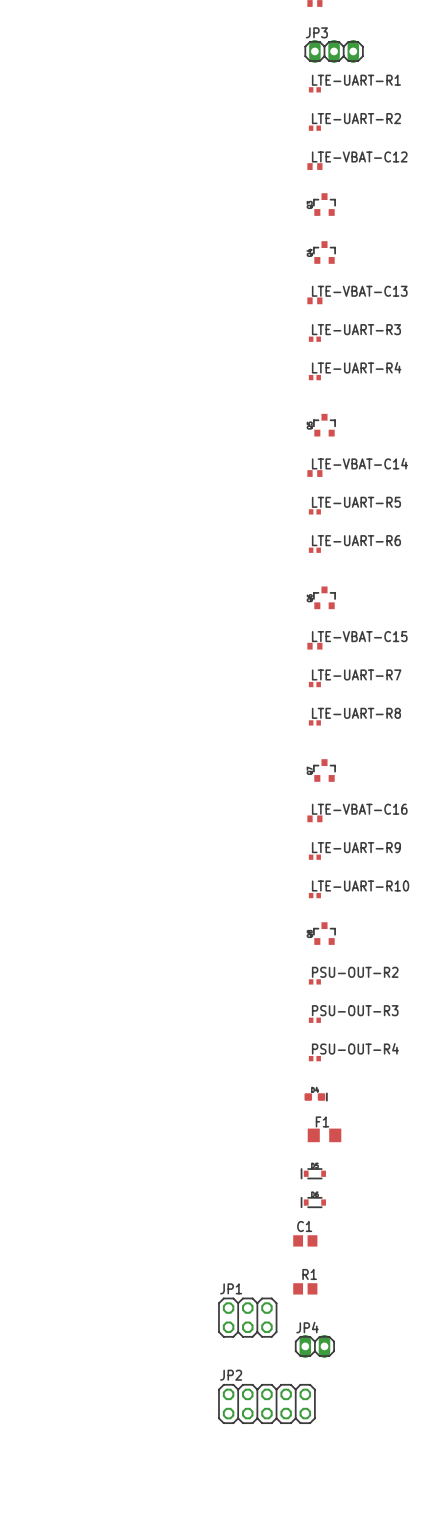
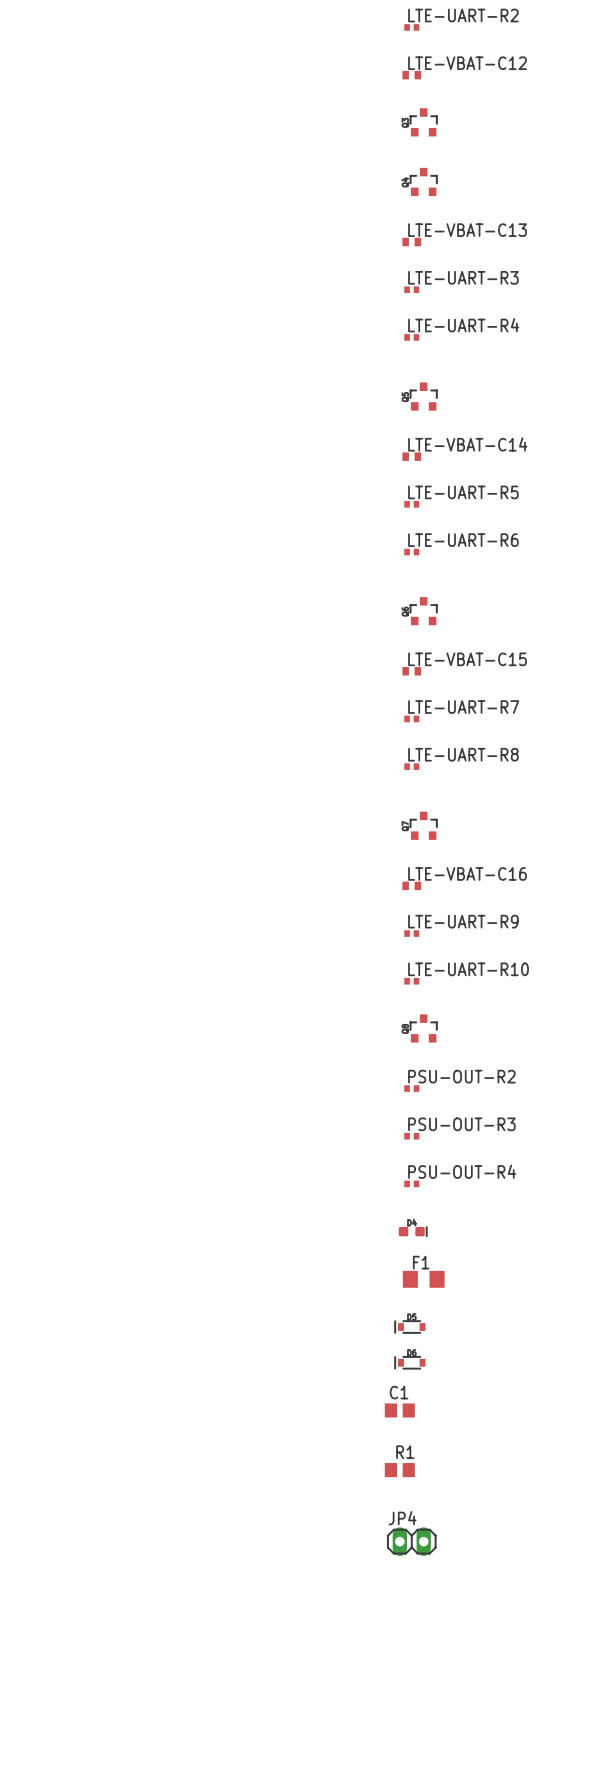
JP1: (247, 1317) -> none
JP2: (266, 1403) -> none

